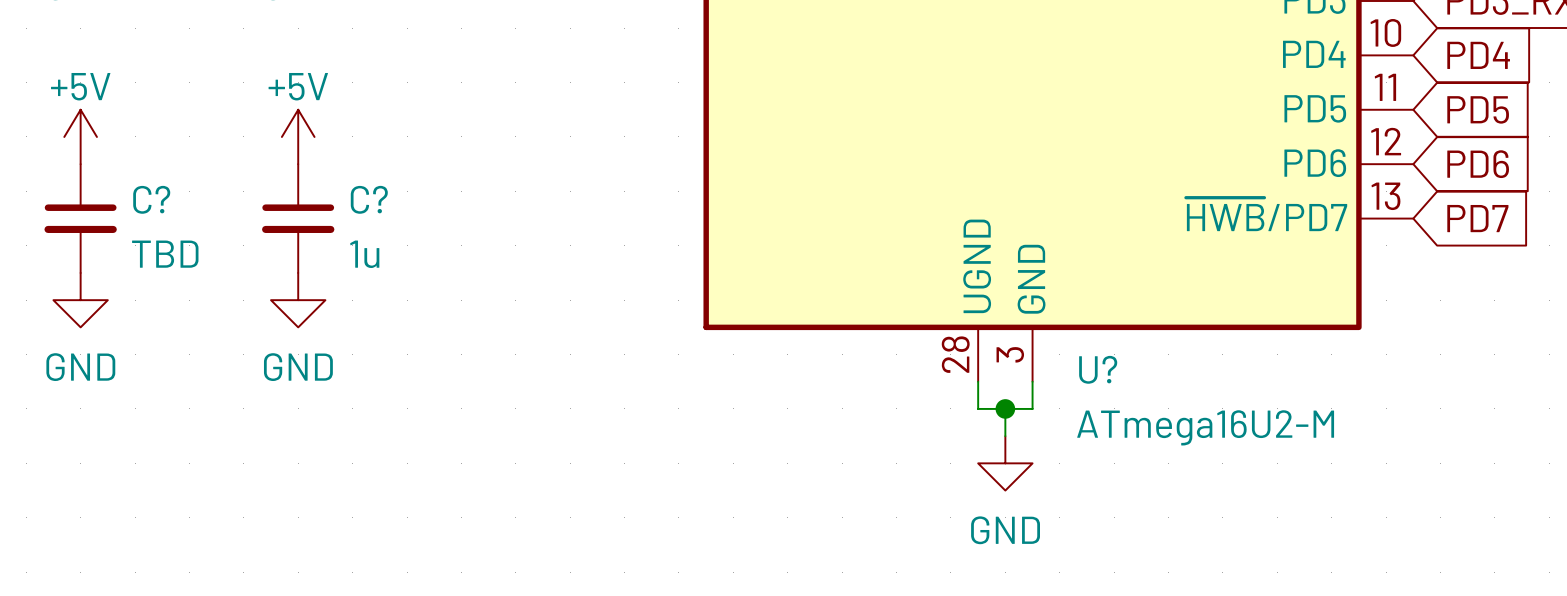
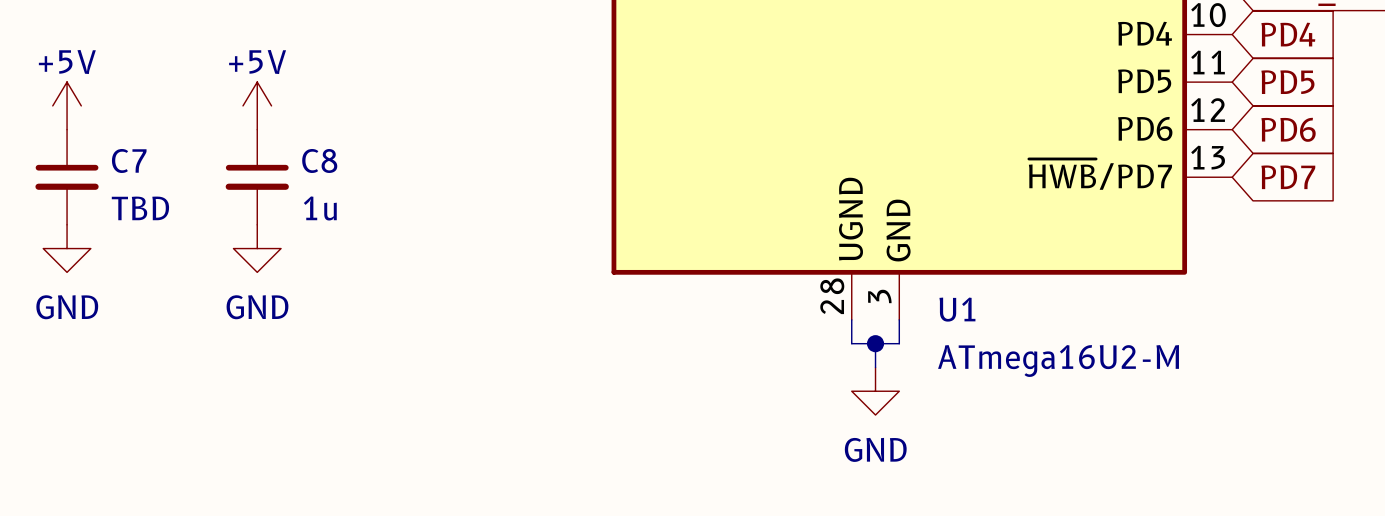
C? name: C? (151, 199) -> C7 (129, 160)
C? name: C? (369, 199) -> C8 (319, 160)
U? name: U? (1098, 369) -> U1 (957, 309)

